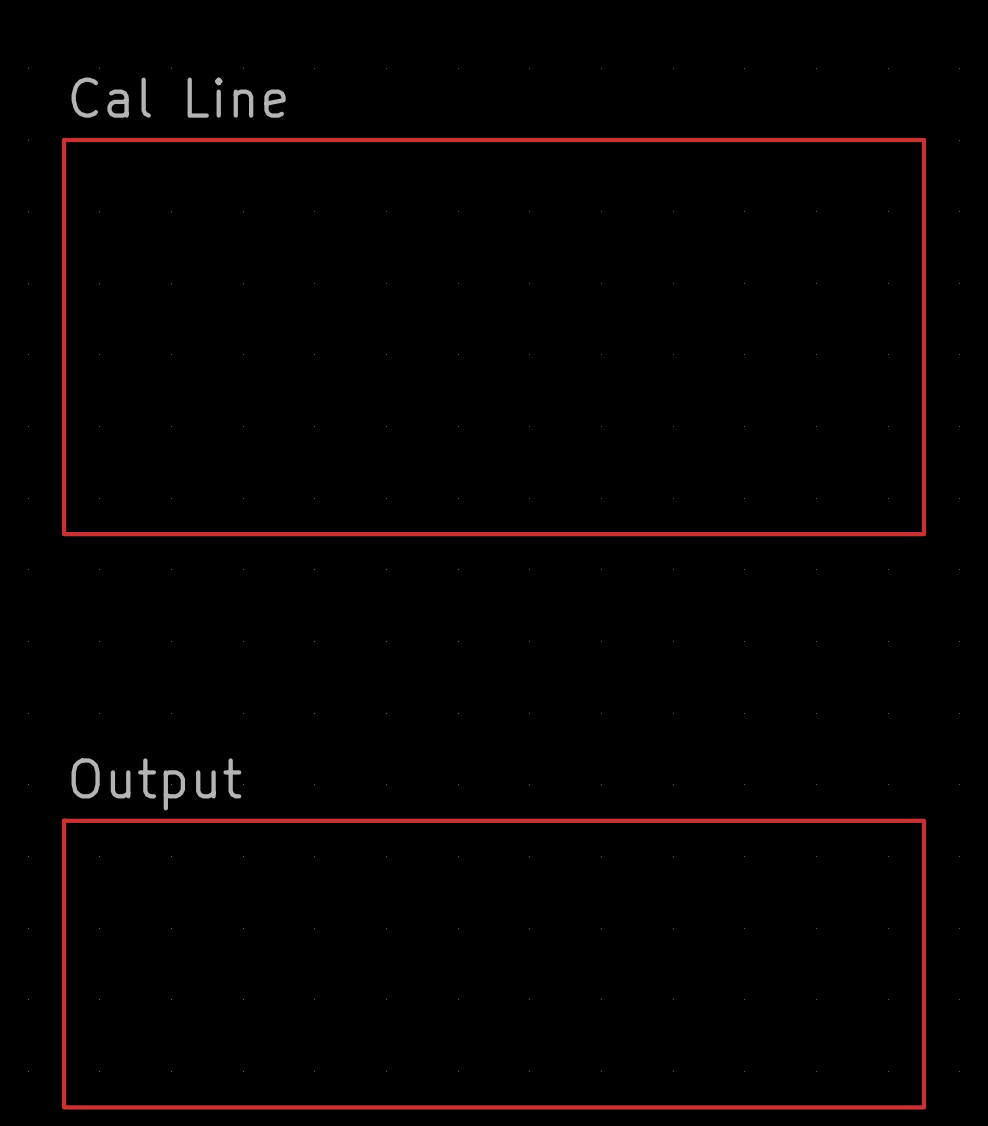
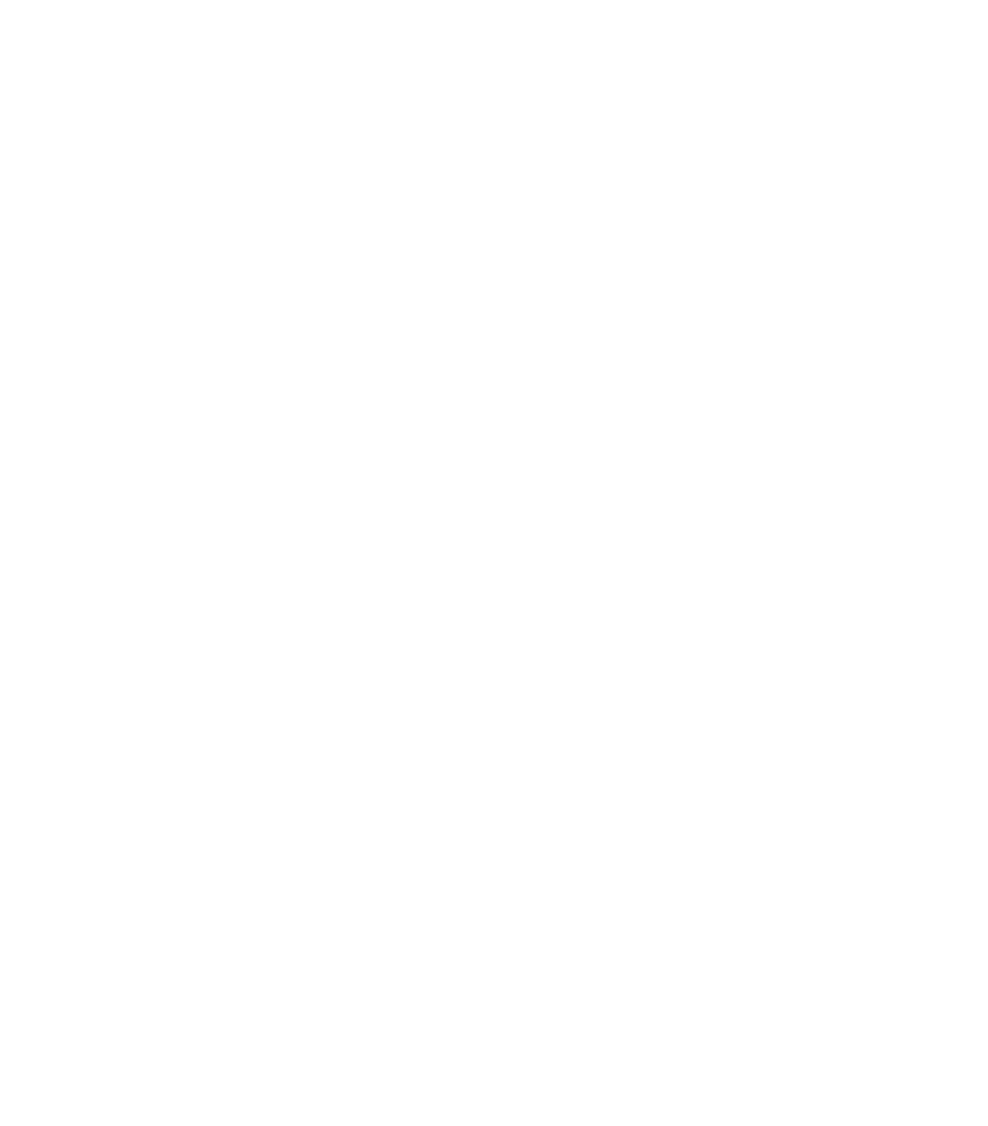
sheet Cal Line: (494, 337) -> none
sheet Output: (494, 964) -> none

